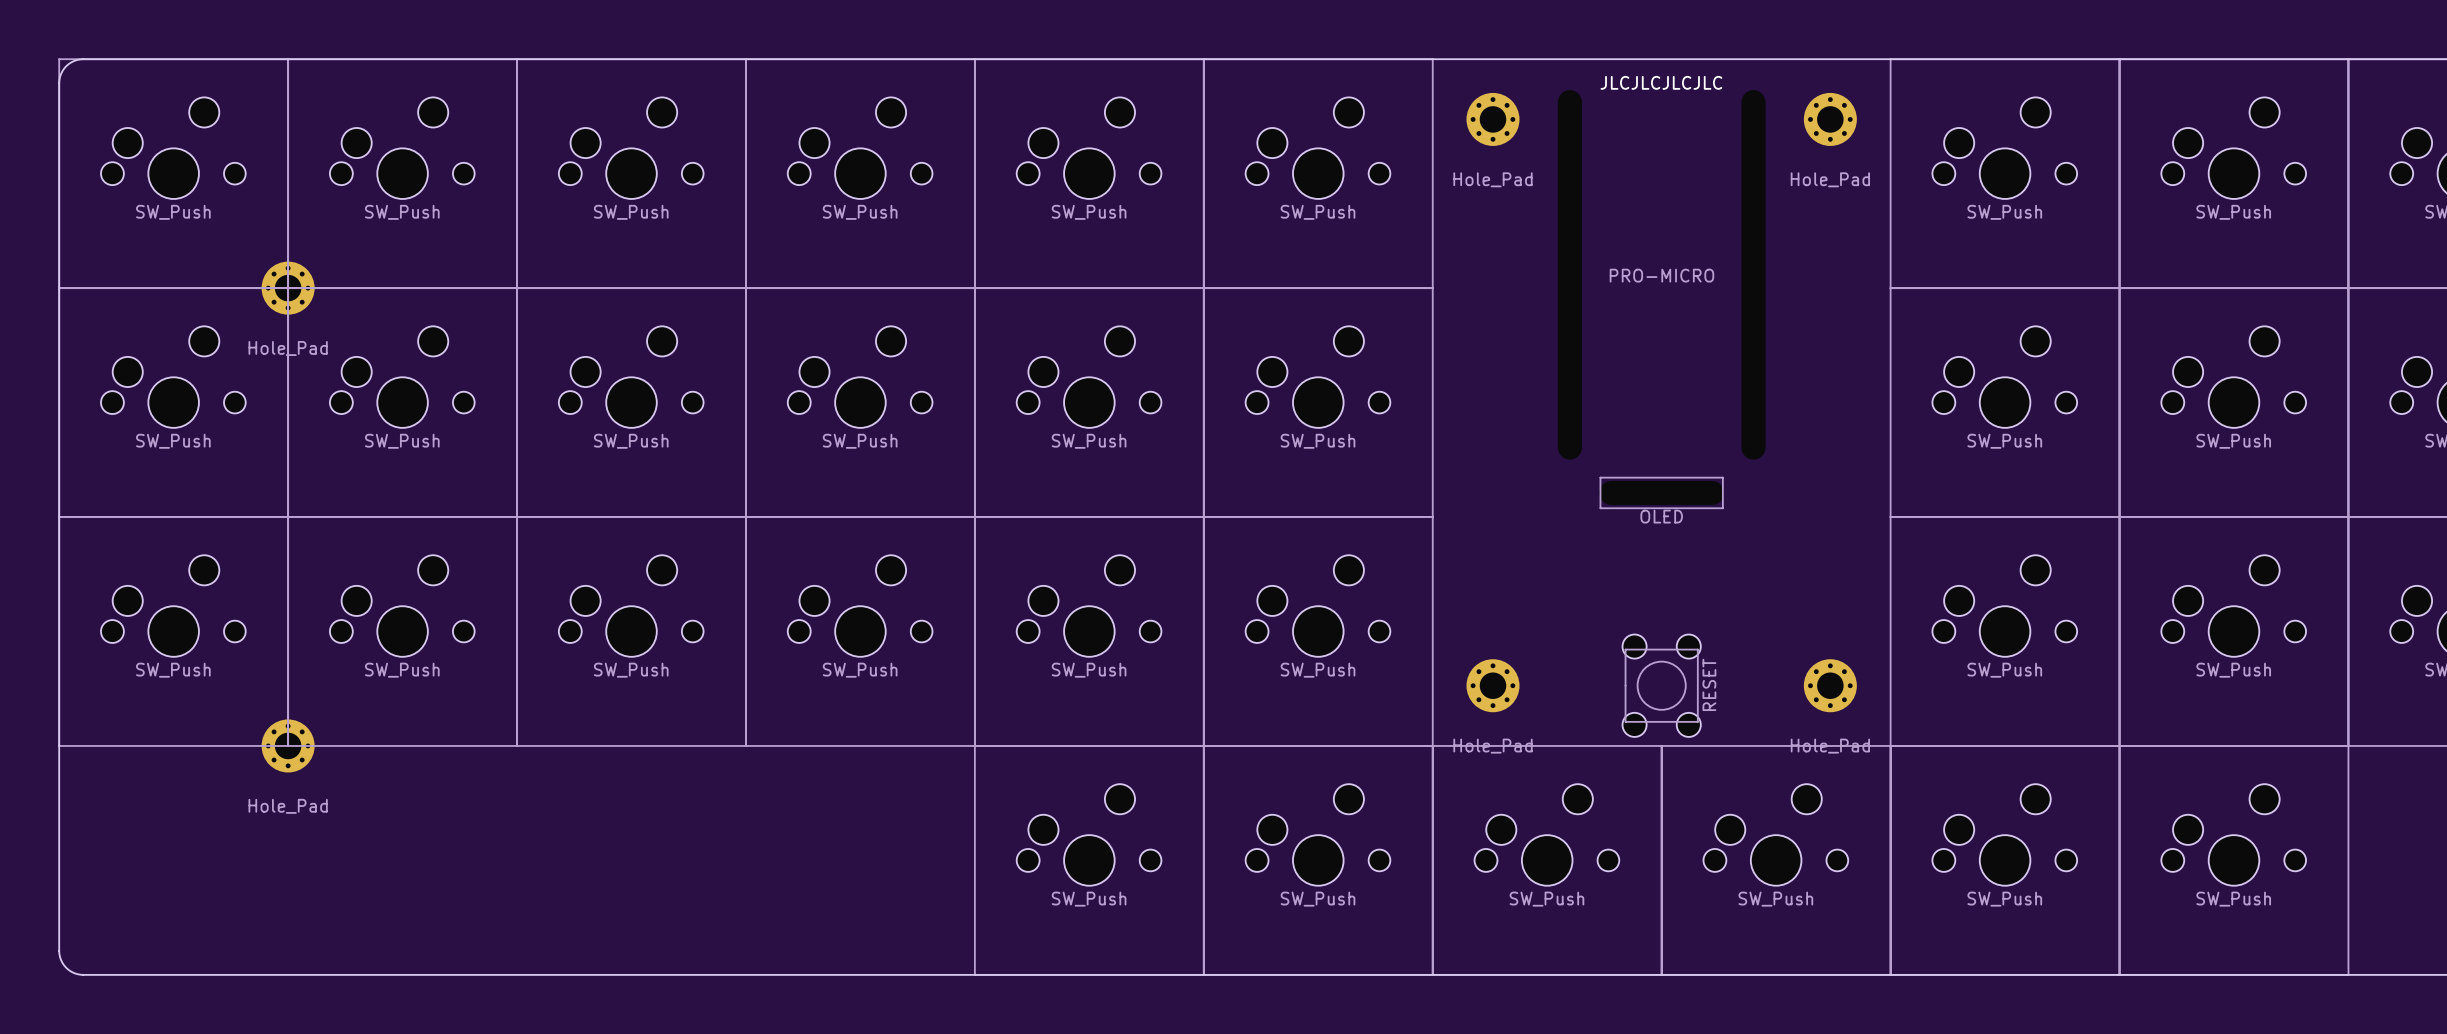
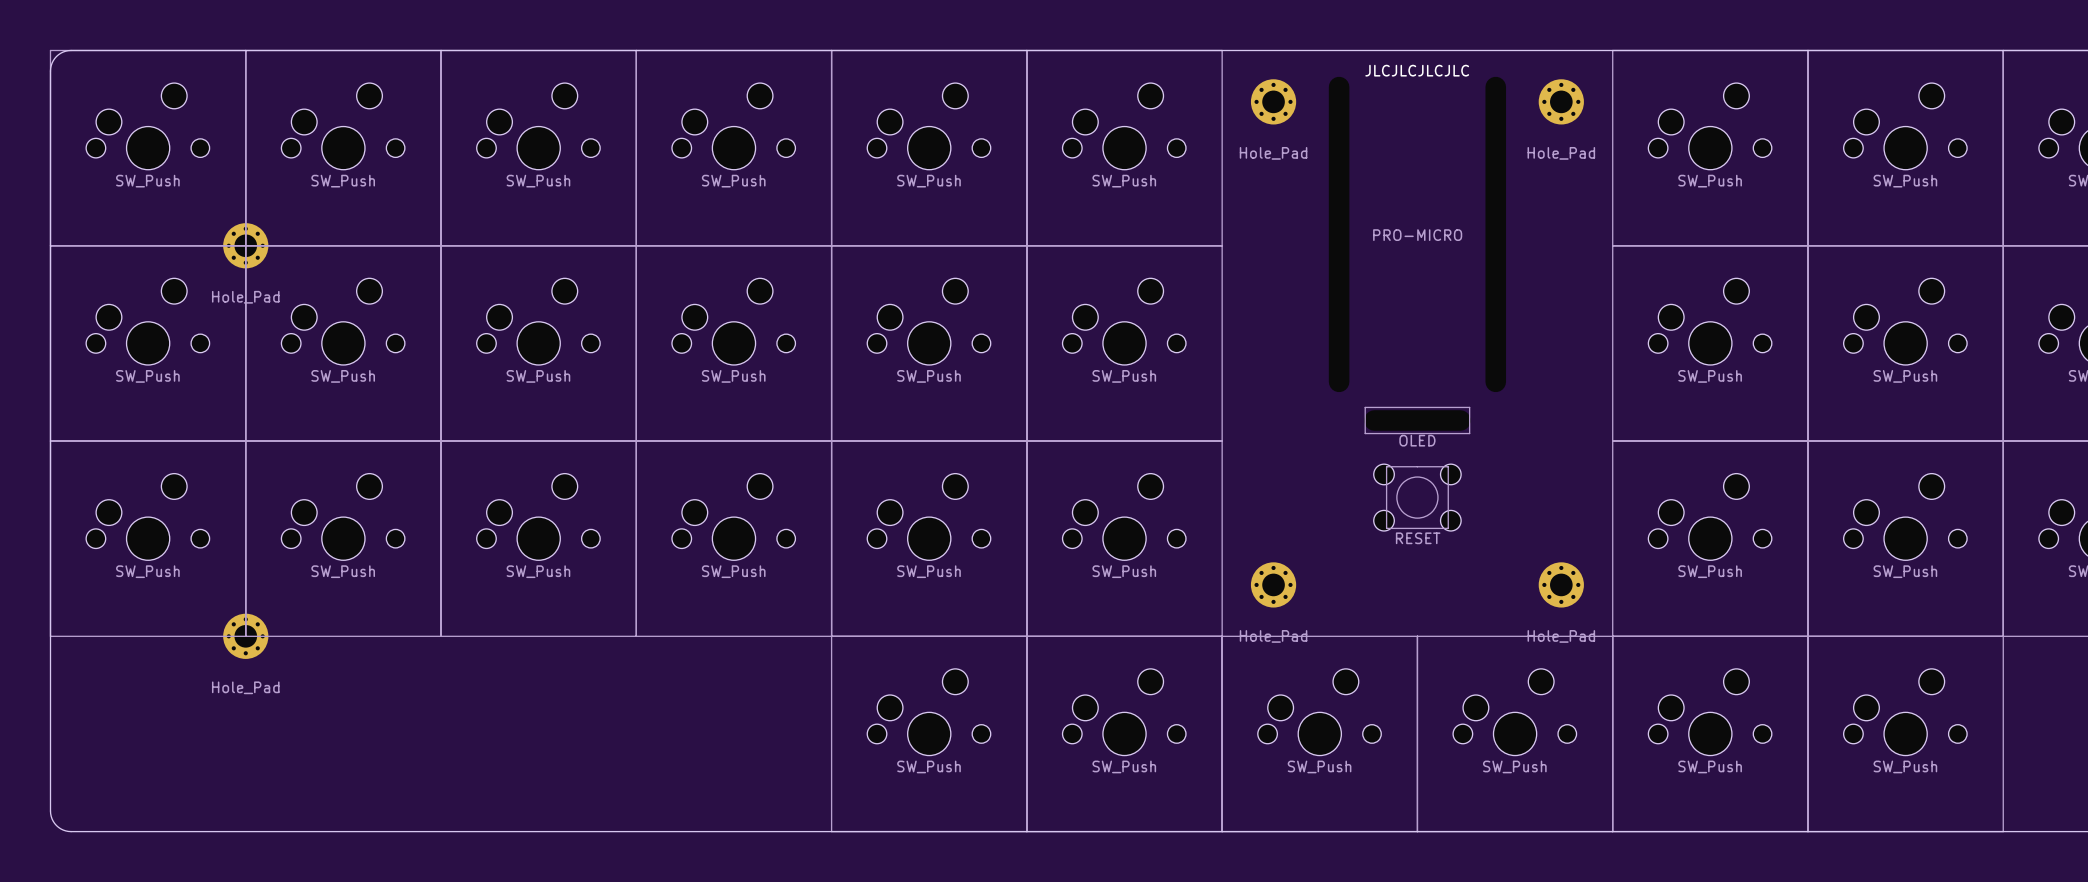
part rotation: 0° (1661, 685) -> 90° clockwise (1417, 497)
part position: (1661, 685) -> (1417, 497)

